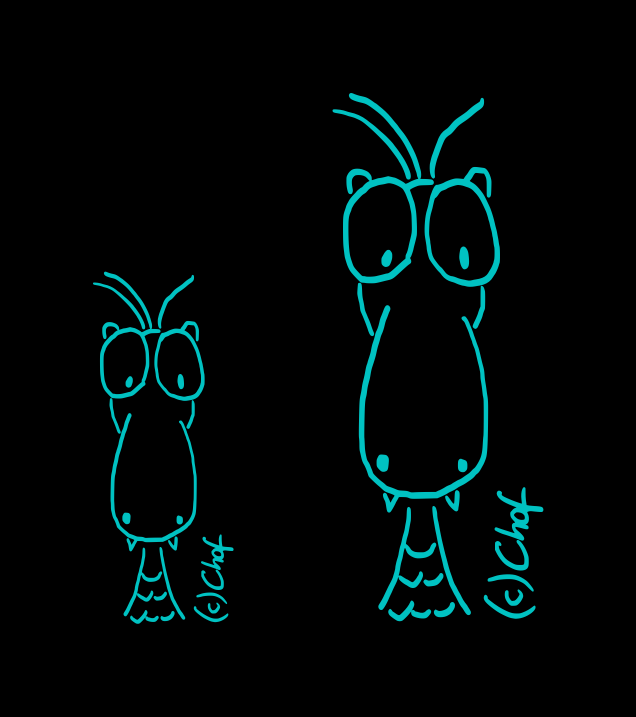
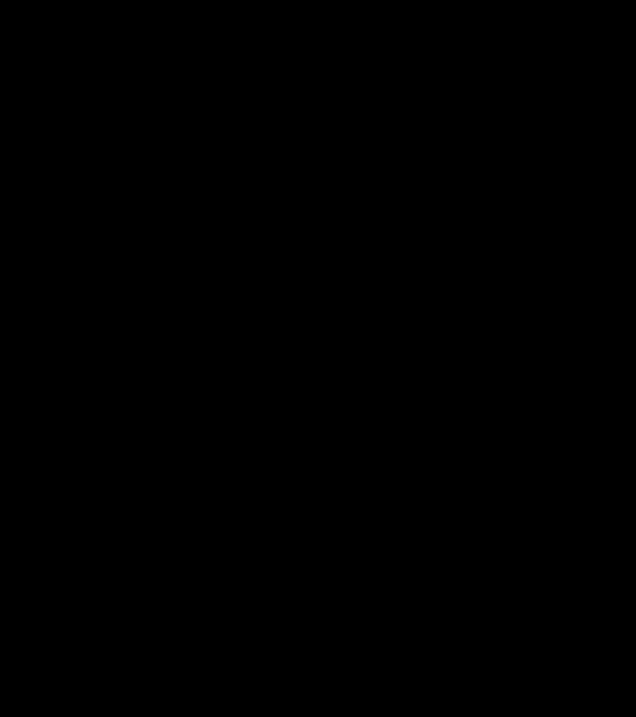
drawing: [332, 92, 544, 622] -> none
drawing: [92, 271, 234, 624] -> none

